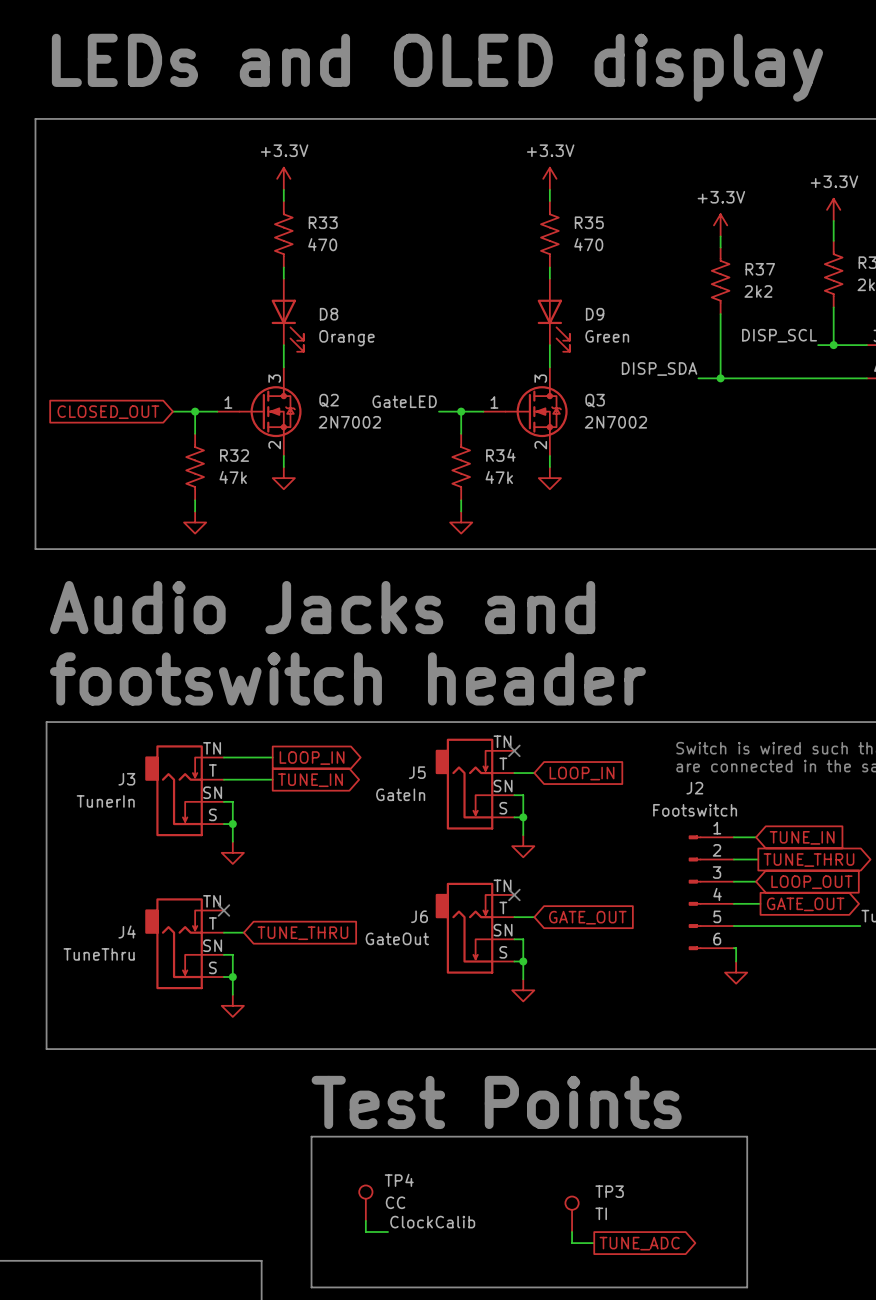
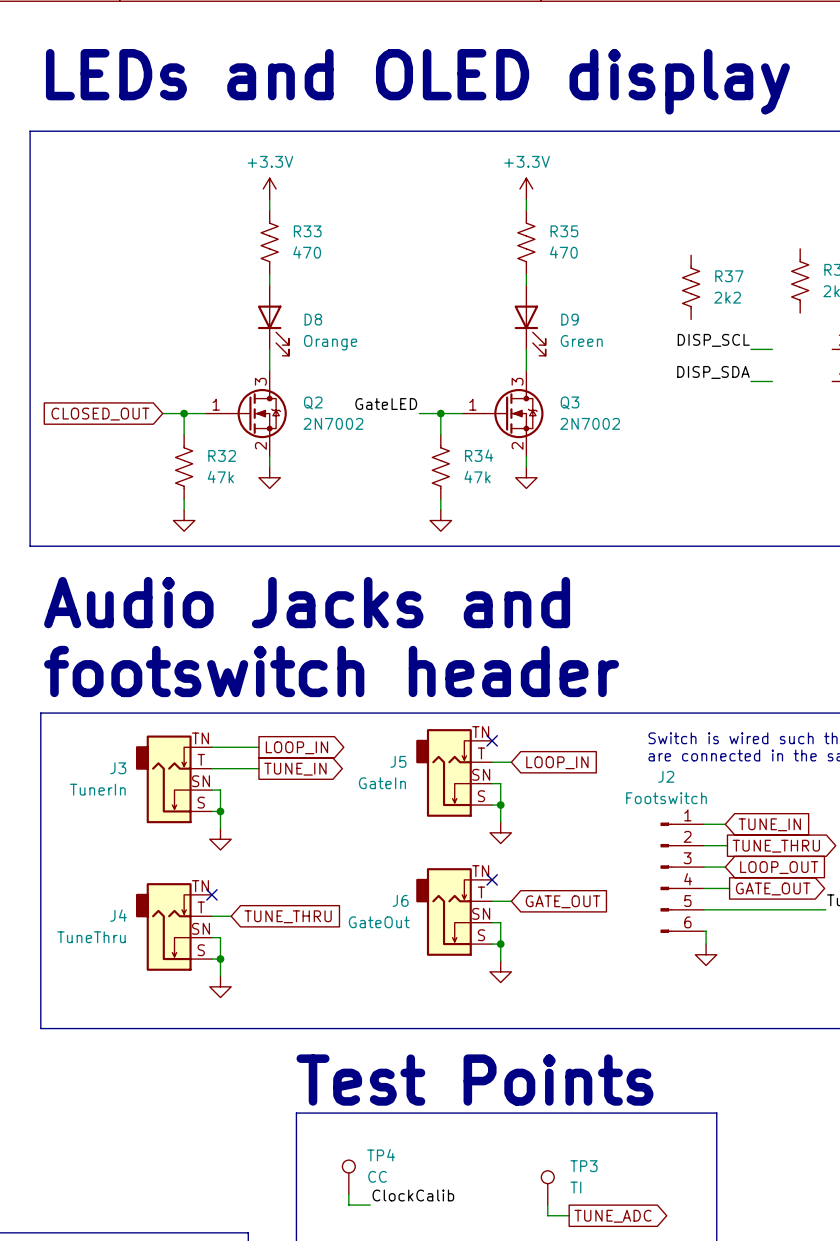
power symbol: +3.3V (833, 209) -> none
wire: (833, 220) (833, 240) -> none
power symbol: +3.3V (720, 225) -> none
wire: (720, 236) (720, 247) -> none
wire: (833, 307) (833, 345) -> none
wire: (720, 314) (720, 378) -> none
label position: DISP_SCL (779, 335) -> DISP_SCL (713, 340)
wire: none -> (750, 349) (772, 349)
wire: (818, 345) (866, 345) -> none
junction: (833, 345) -> none
label position: DISP_SDA (659, 369) -> DISP_SDA (713, 372)
wire: (698, 378) (782, 378) -> none
junction: (720, 378) -> none
wire: (804, 378) (866, 378) -> none

